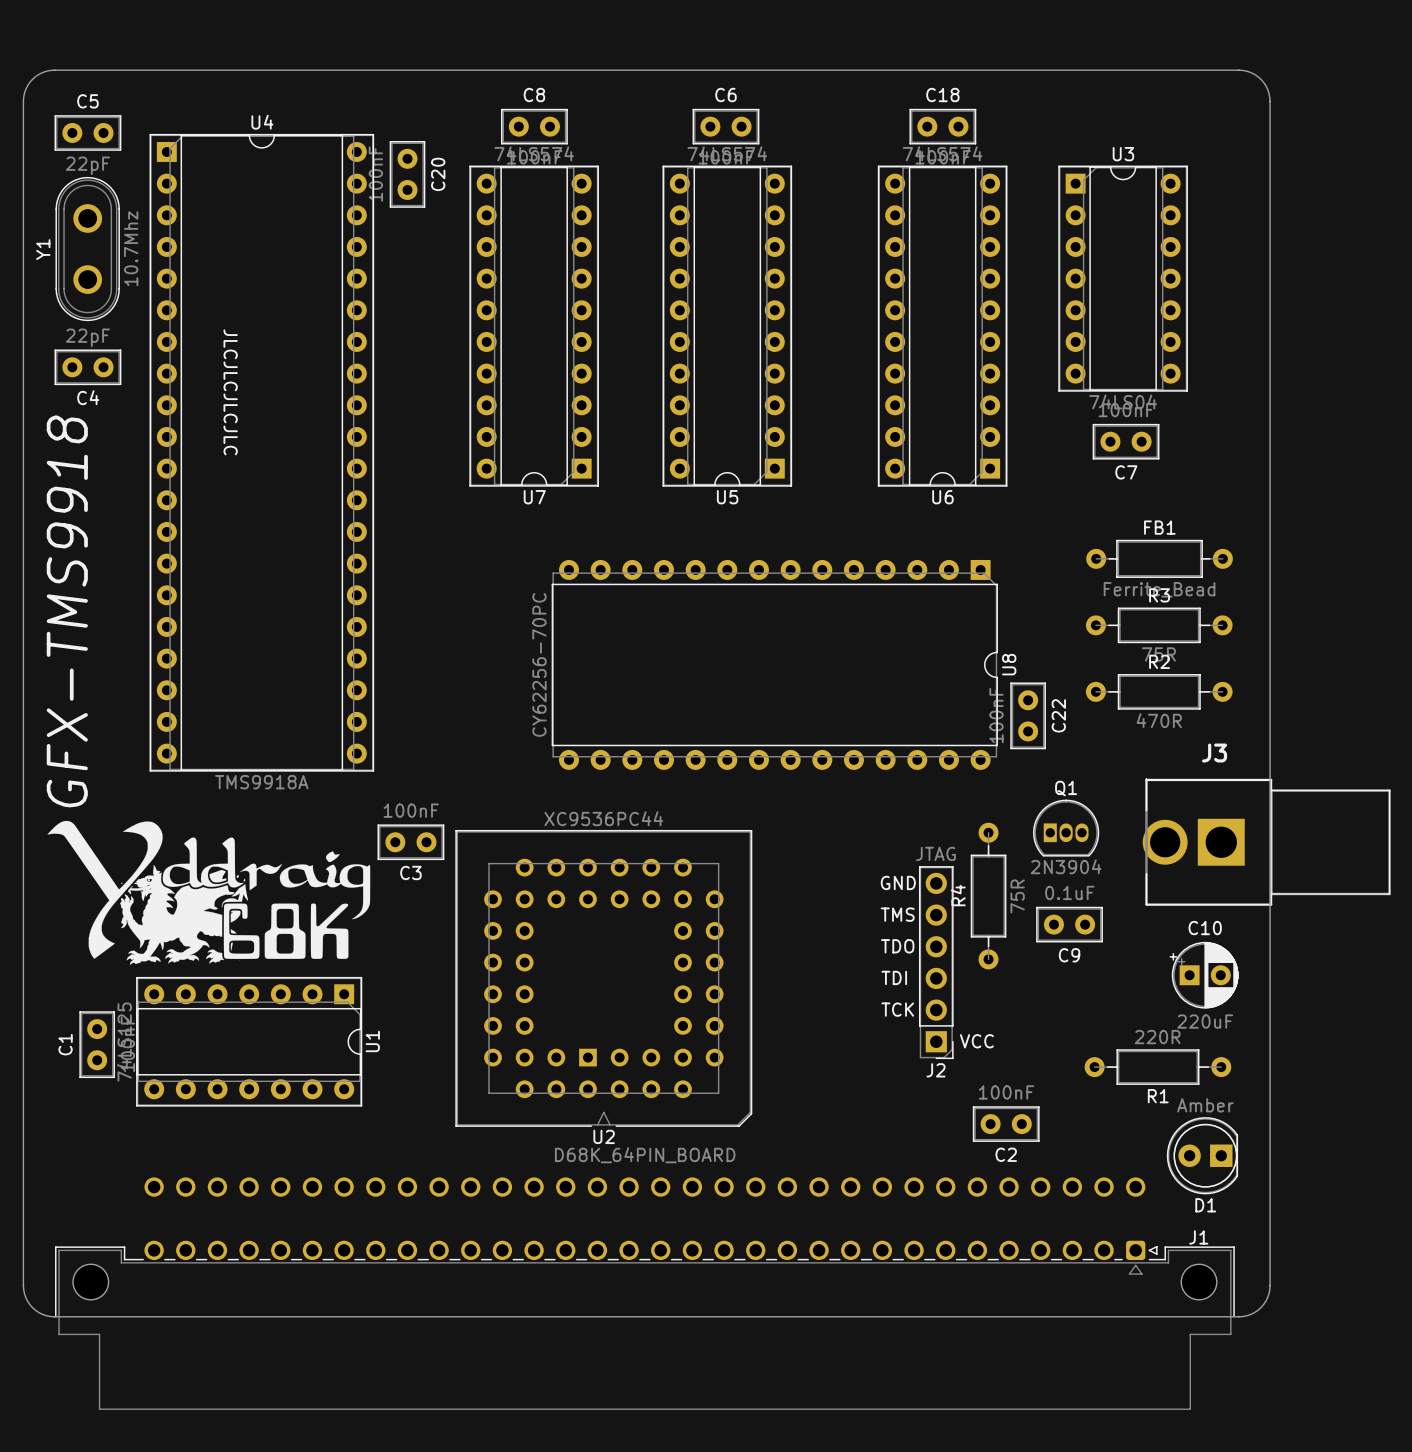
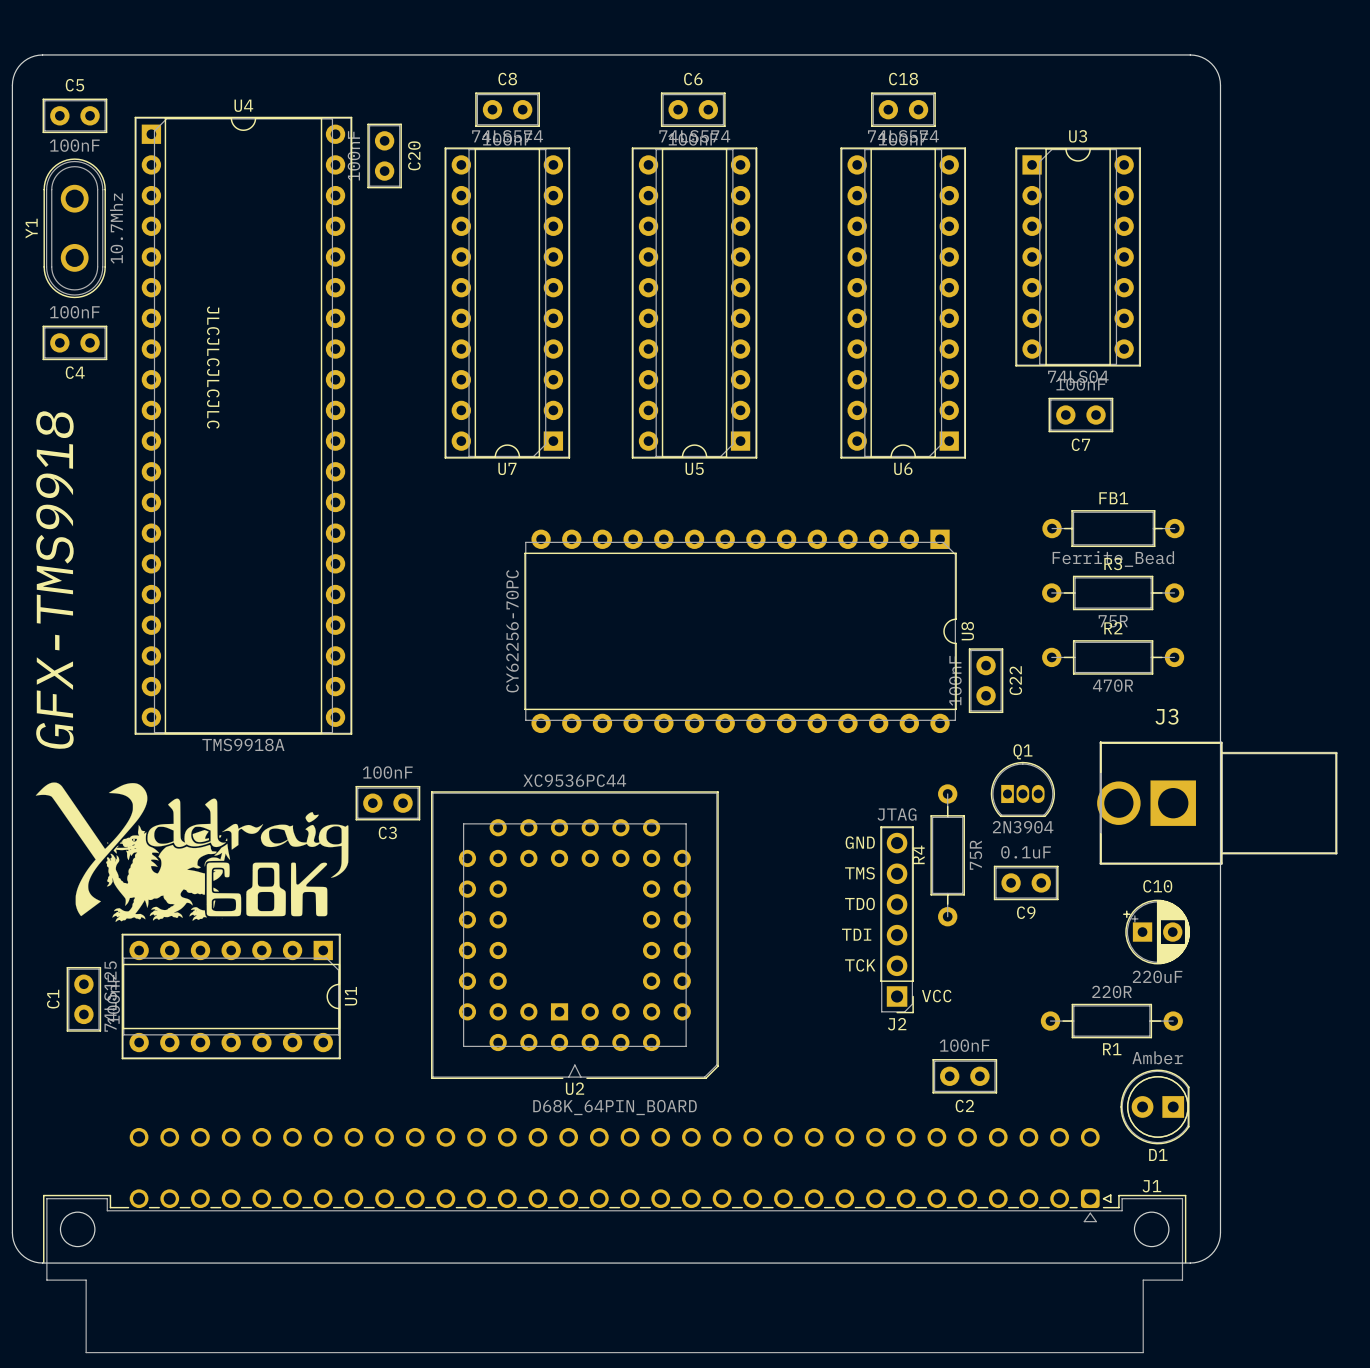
C5 value: 22pF (87, 165) -> 100nF (74, 145)
C4 value: 22pF (87, 337) -> 100nF (74, 312)

